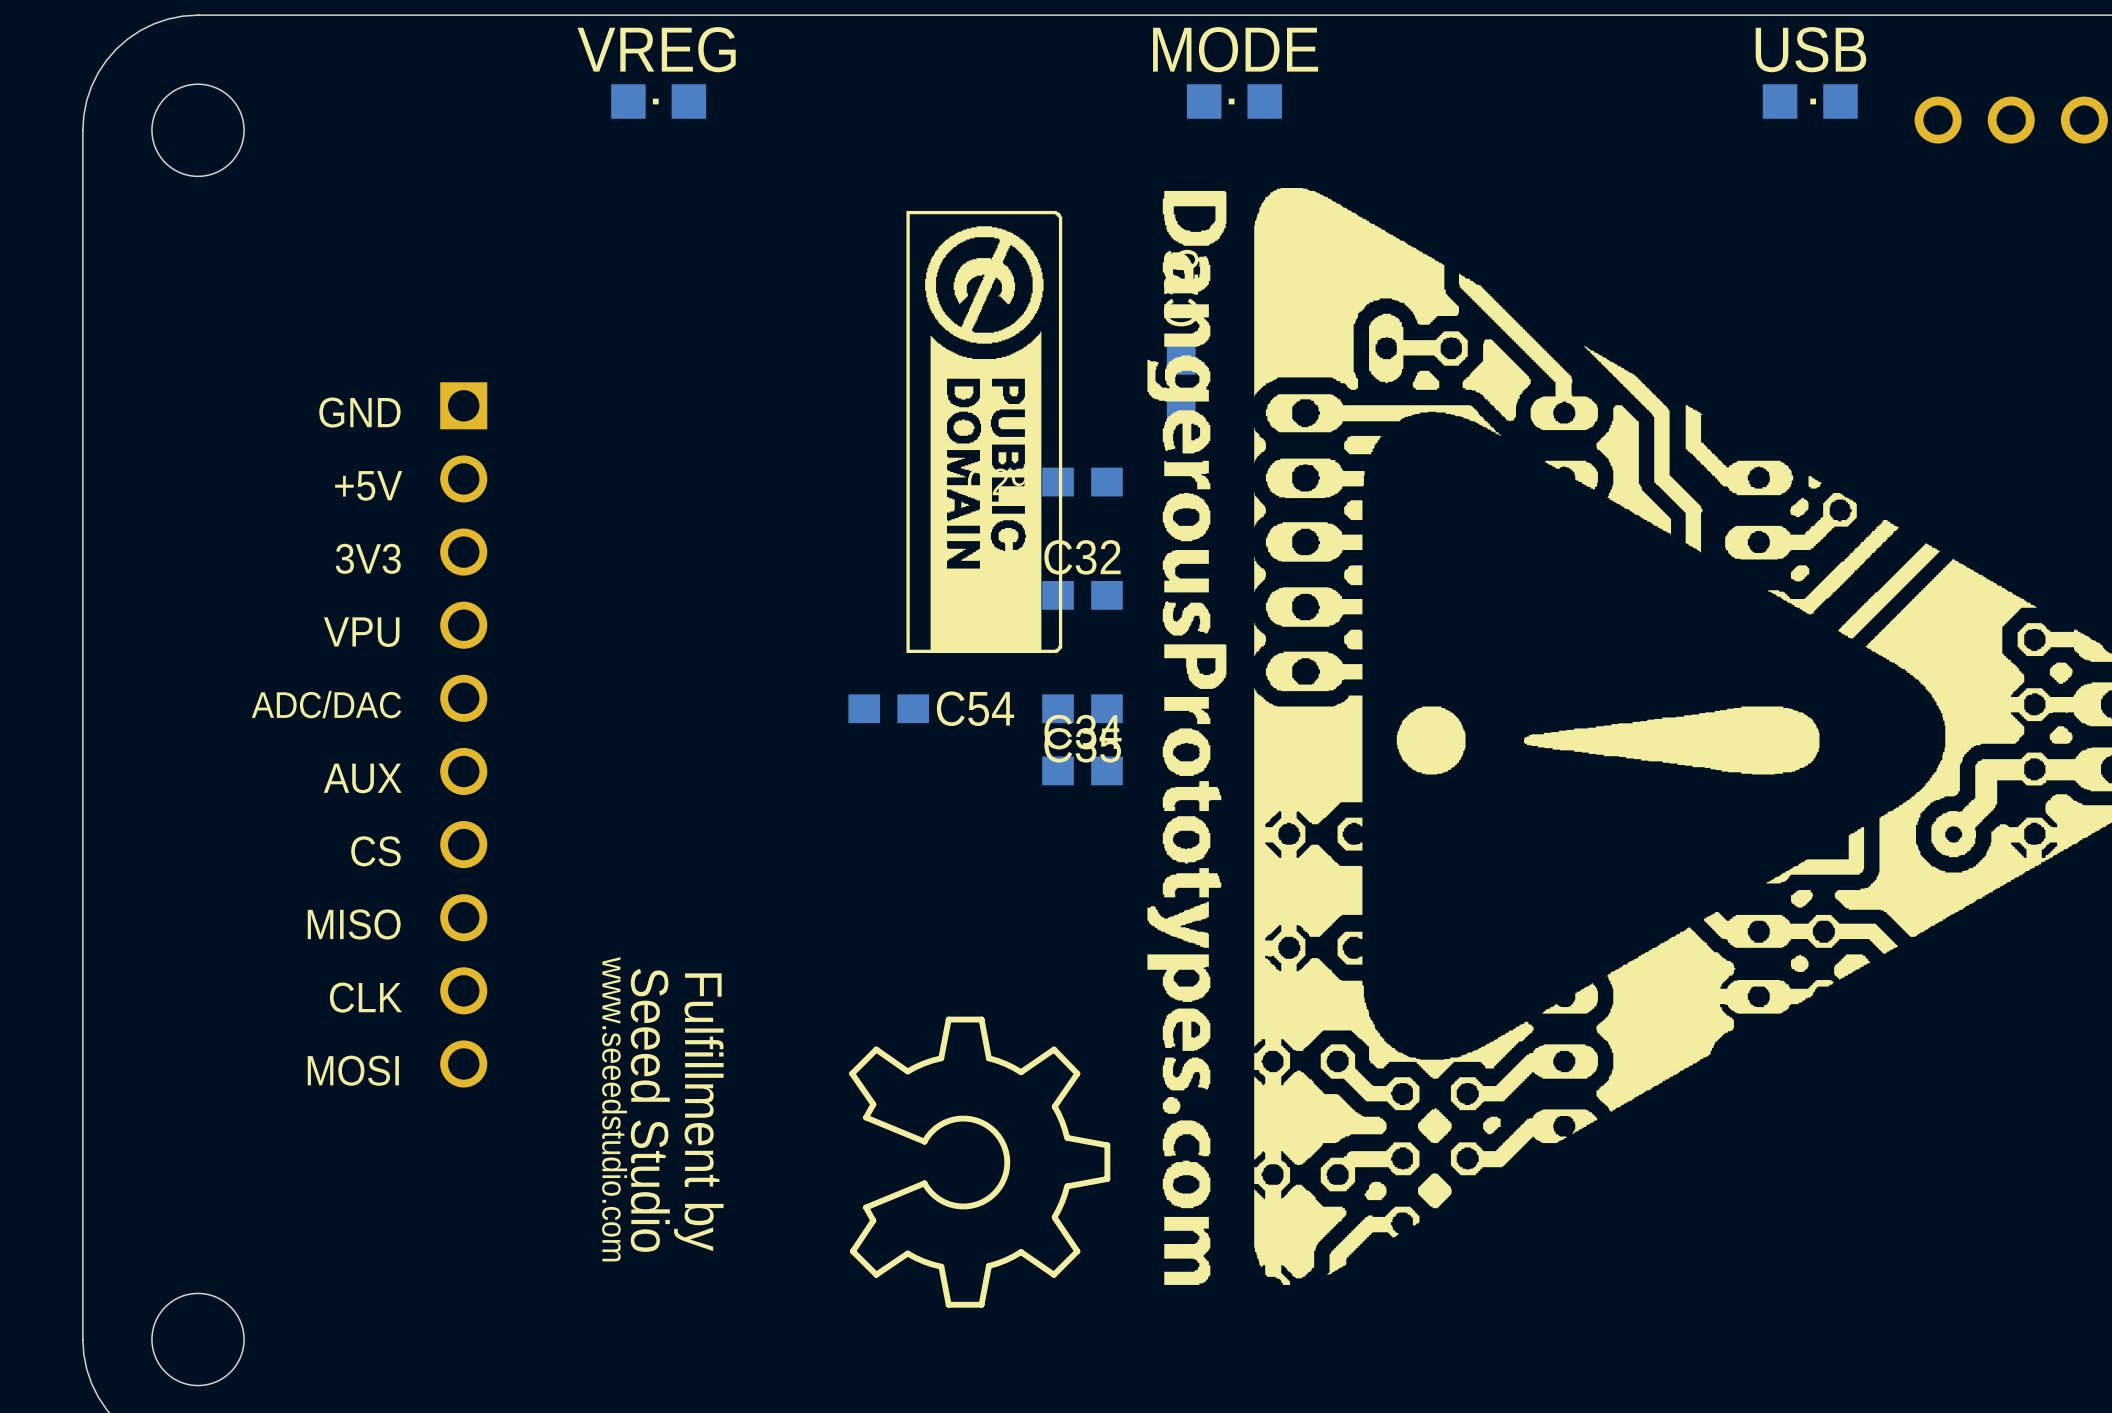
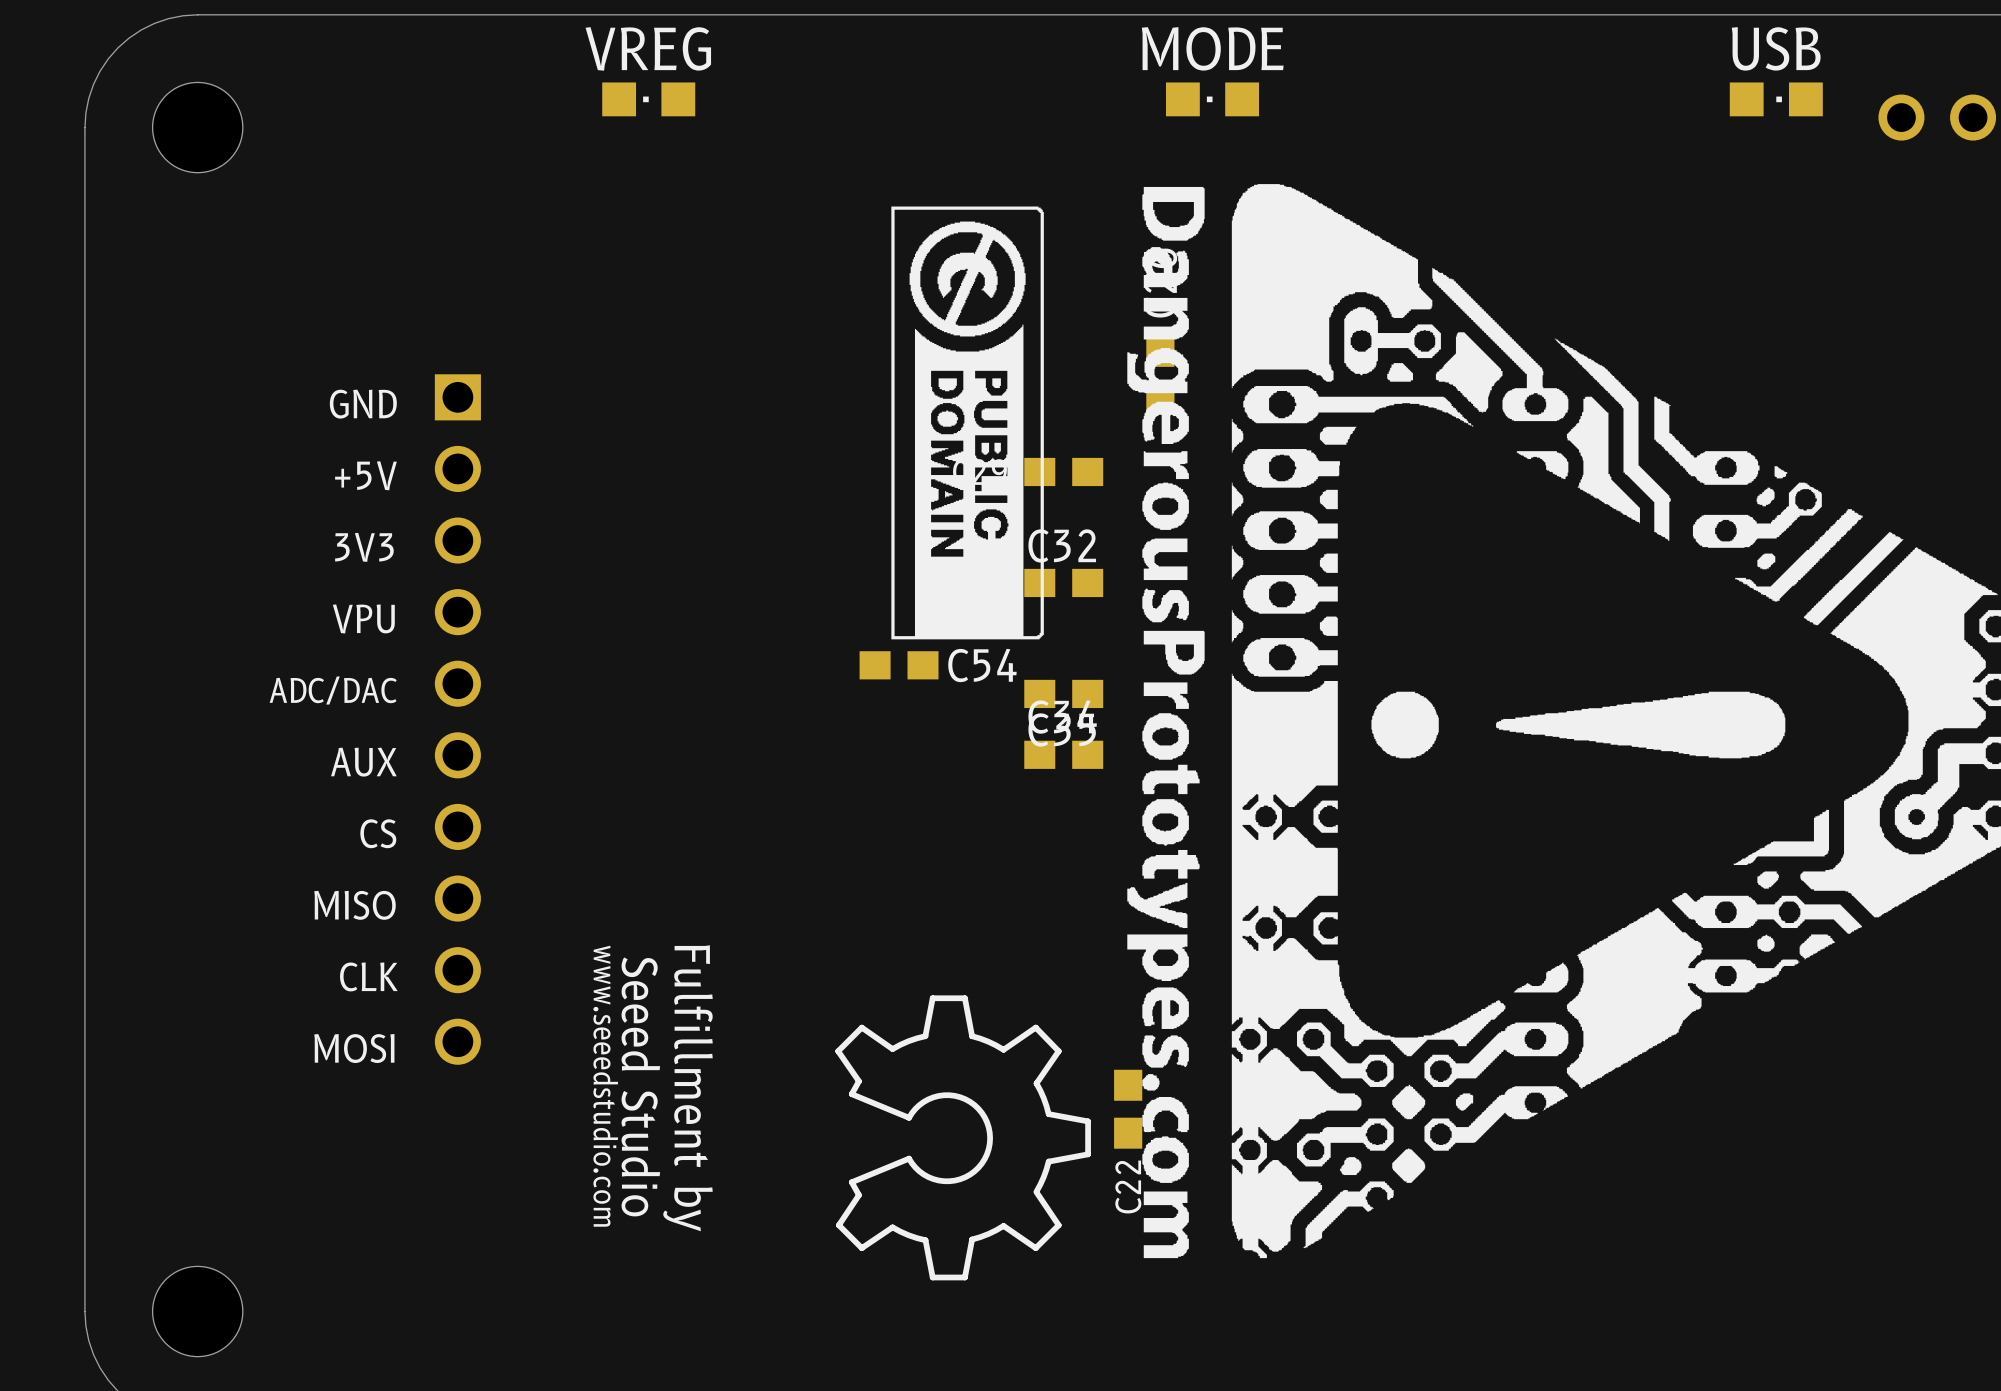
C54 position: (888, 708) -> (899, 665)
C22: none -> (1128, 1109)

